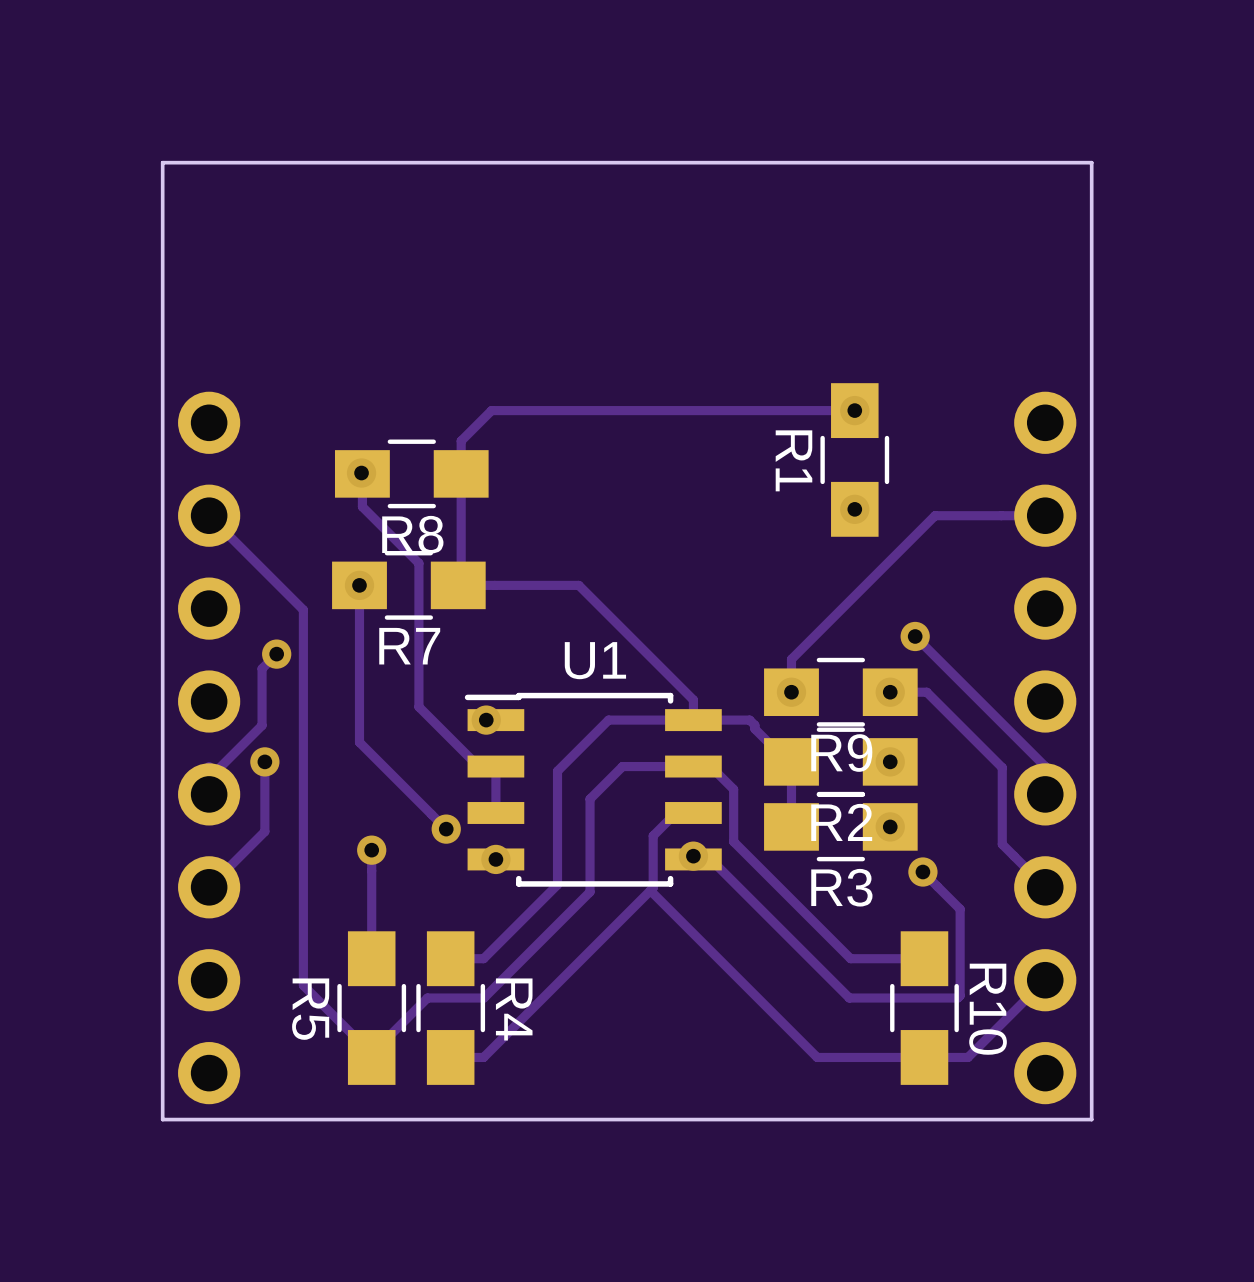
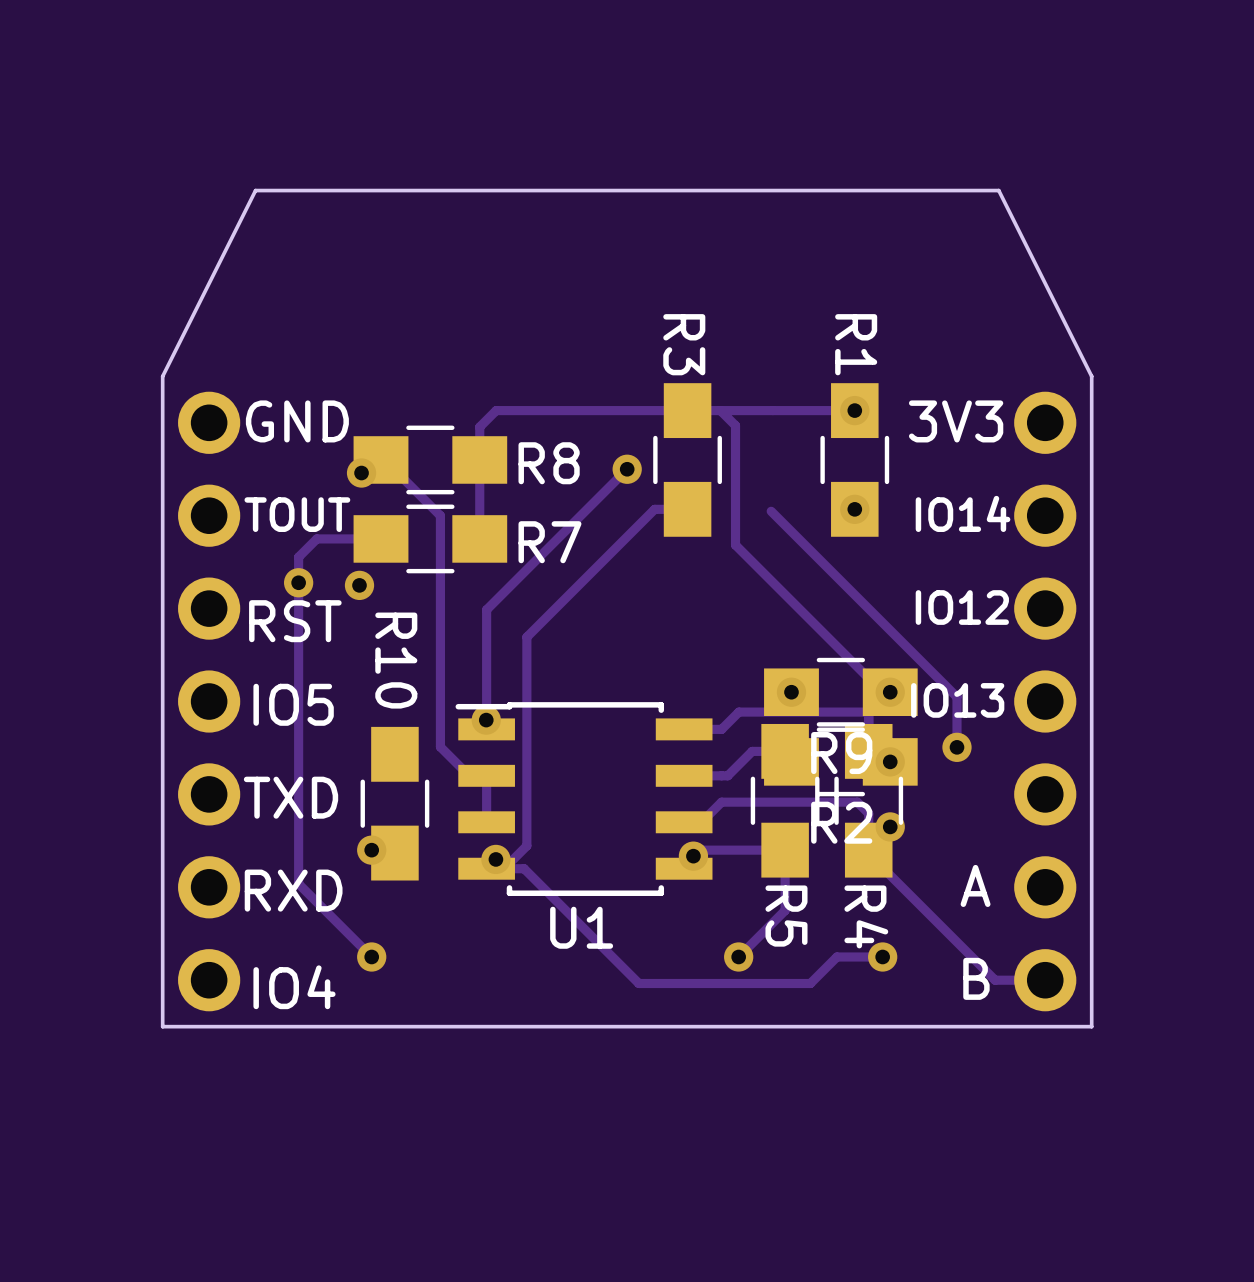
board edge: (1091, 376) (1091, 162) (162, 162) (162, 376) -> (1091, 376) (998, 190) (255, 190) (162, 376)
track: (496, 410) (491, 410) (461, 440) (461, 582) (458, 585) (578, 585) (693, 699) (693, 720) -> (496, 410) (479, 427) (479, 538)
track: none -> (720, 410) (735, 425) (735, 545) (868, 678) (868, 751)
text: none -> GND (297, 421)
text: none -> 3V3 (956, 421)
track: none -> (381, 459) (384, 459) (440, 515) (440, 747) (469, 775) (486, 775) (486, 822)
R1 name position: R1 (793, 460) -> R1 (856, 344)
track: none -> (627, 469) (486, 609) (486, 729)
via: none -> (627, 469)
track: (362, 473) (362, 506) (418, 563) (418, 706) (478, 766) (495, 766) (495, 812) -> none
R8 position: (411, 473) -> (430, 459)
track: none -> (687, 509) (654, 509) (526, 637) (526, 845) (504, 868)
track: none -> (771, 511) (956, 696)
text: none -> TOUT (297, 514)
text: none -> IO14 (963, 513)
track: (209, 515) (303, 609) (303, 985) (371, 1053) -> none
track: (1045, 515) (935, 515) (791, 659) (791, 692) -> none
R8 name position: R8 (412, 534) -> R8 (549, 463)
track: none -> (381, 538) (316, 538) (298, 557) (298, 883) (371, 956)
track: (359, 585) (359, 742) (446, 829) -> none
R7 position: (408, 585) -> (430, 538)
text: none -> IO12 (962, 607)
text: none -> RST (295, 621)
track: (915, 636) (1045, 766) (1045, 794) -> none
via: (915, 636) -> none
R7 name position: R7 (409, 646) -> R7 (549, 542)
track: (276, 654) (262, 668) (262, 725) (209, 778) -> none
via position: (276, 654) -> (298, 582)
U1 name position: U1 (595, 660) -> U1 (581, 927)
track: (890, 692) (926, 692) (1002, 767) (1002, 844) (1045, 887) -> none
track: none -> (956, 696) (956, 747)
text: none -> IO13 (957, 700)
part: none -> (209, 701)
part: none -> (1045, 701)
text: none -> IO5 (293, 704)
track: none -> (868, 714) (865, 712) (738, 712) (721, 729) (684, 729)
part: (209, 747) -> none
via: none -> (956, 747)
part: (1045, 747) -> none
track: none -> (785, 751) (752, 751) (727, 775) (684, 775)
track: (264, 761) (264, 831) (209, 887) -> none
via: (264, 761) -> none
U1 position: (593, 789) -> (584, 799)
text: none -> TXD (291, 797)
track: (693, 812) (676, 812) (653, 835) (653, 887) (483, 1057) (450, 1057) -> none
track: (791, 826) (791, 761) (787, 761) (754, 728) (754, 725) (749, 720) (608, 720) (557, 771) (557, 884) (483, 958) (450, 958) -> none
R3 rotation: 0° (840, 826) -> 90° clockwise (687, 459)
R3 position: (840, 826) -> (687, 459)
via: (446, 829) -> none
track: (371, 850) (371, 958) -> none
track: (693, 856) (693, 859) (710, 859) (849, 998) (957, 998) (960, 995) (960, 909) (922, 872) -> none
track: none -> (486, 868) (524, 868) (638, 983) (810, 983) (836, 956) (882, 956)
track: none -> (684, 868) (702, 850) (785, 850) (785, 910) (738, 956)
via: (922, 872) -> none
text: none -> A (975, 885)
R3 name position: R3 (841, 887) -> R3 (684, 344)
text: none -> RXD (293, 890)
track: (650, 890) (817, 1057) (968, 1057) (1045, 980) -> (701, 822) (721, 802) (857, 802) (868, 813) (868, 853) (995, 980) (1045, 980)
via: none -> (371, 956)
via: none -> (738, 956)
via: none -> (882, 956)
track: (924, 958) (850, 958) (733, 841) (733, 789) (710, 766) (622, 766) (590, 799) (590, 891) (483, 998) (427, 998) (371, 1053) -> none
text: none -> B (976, 978)
text: none -> IO4 (294, 987)
R5 position: (371, 1008) -> (785, 800)
R4 position: (450, 1008) -> (868, 800)
R10 position: (924, 1008) -> (394, 803)
R5 name position: R5 (310, 1009) -> R5 (786, 916)
R4 name position: R4 (514, 1009) -> R4 (866, 916)
R10 name position: R10 (988, 1009) -> R10 (396, 660)
board edge: (1091, 1026) (1091, 1119) (162, 1119) (162, 1026) -> (1091, 1026) (162, 1026)

